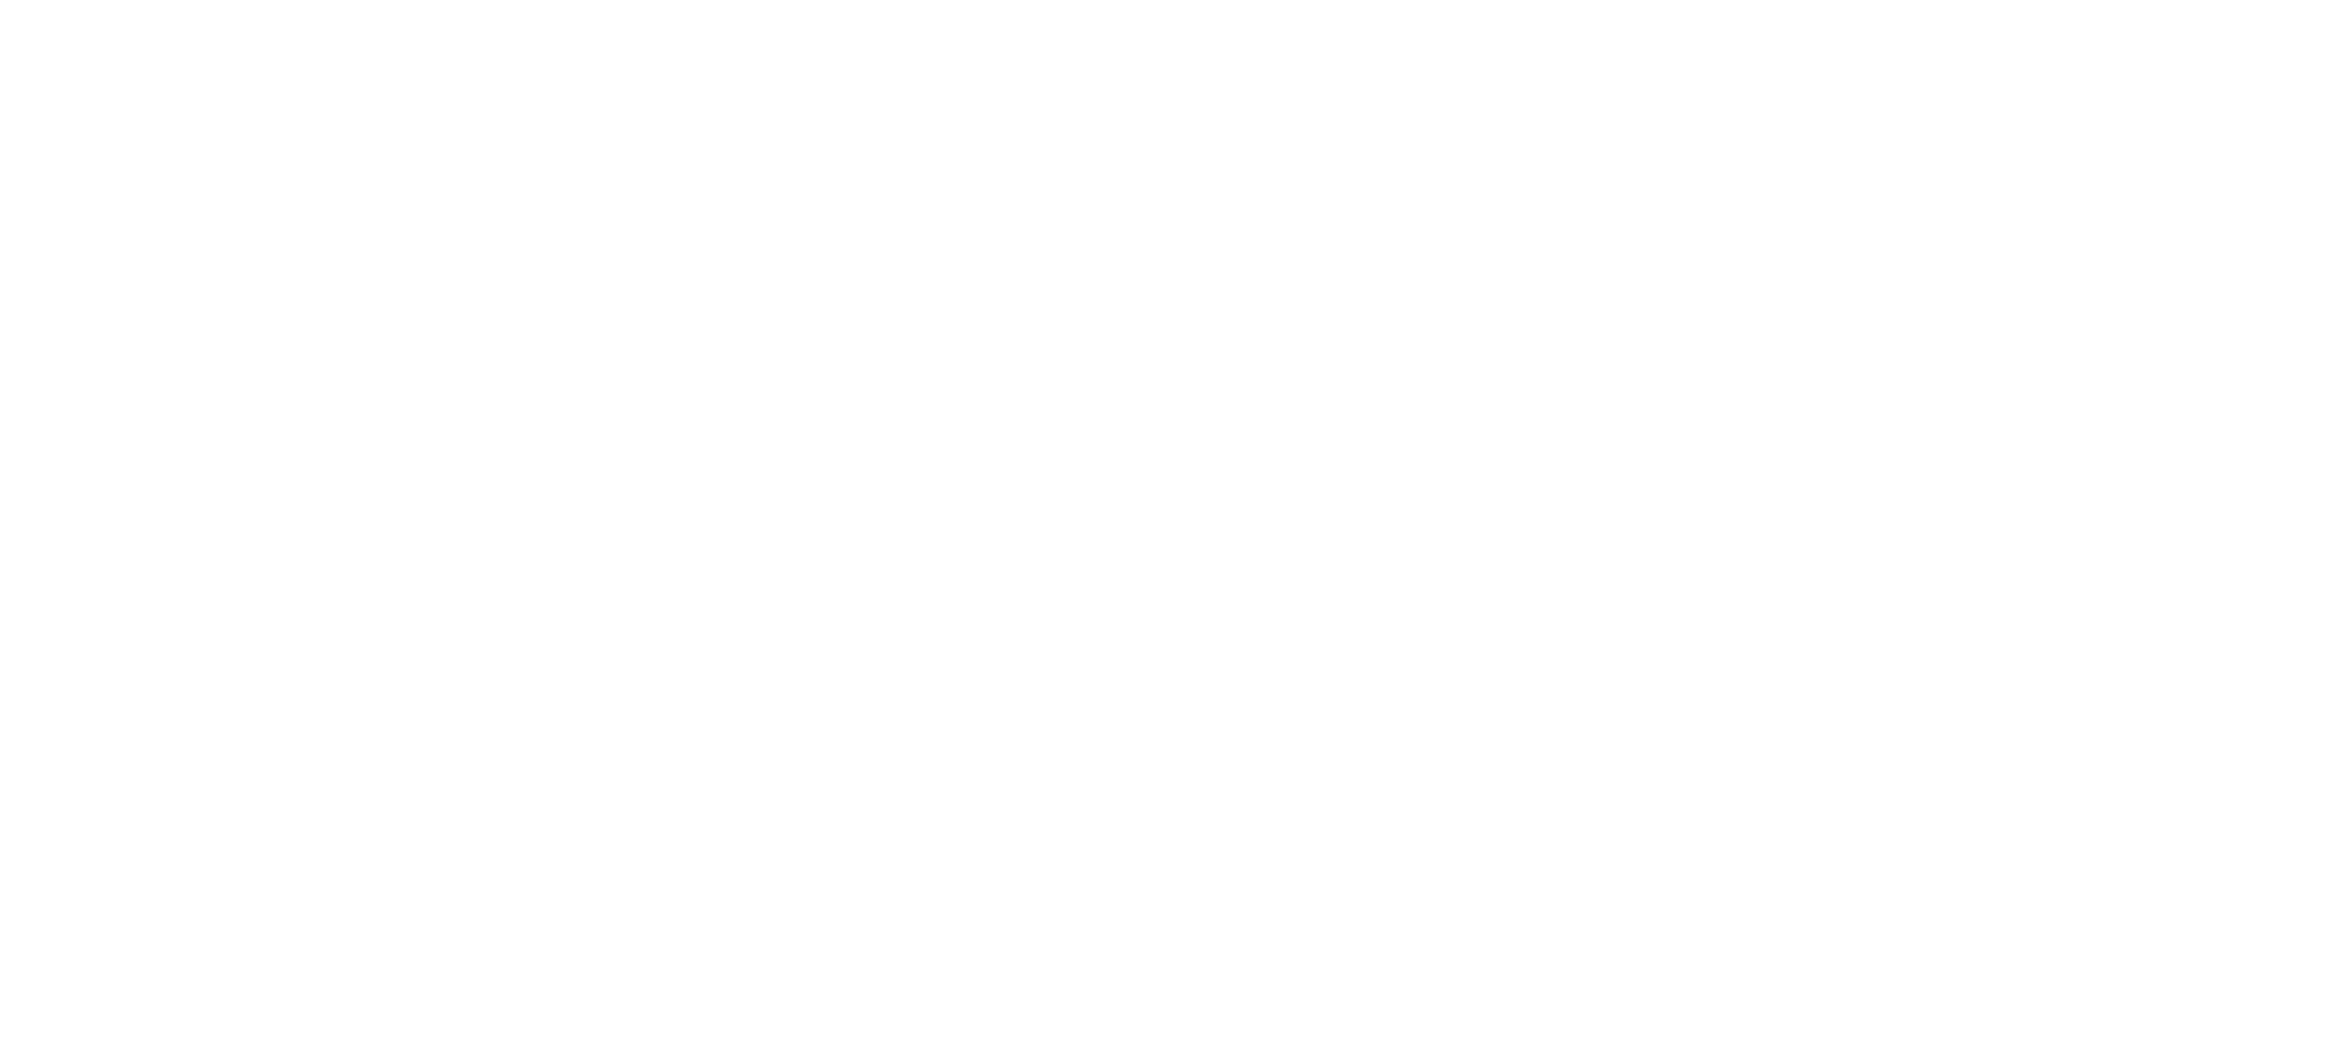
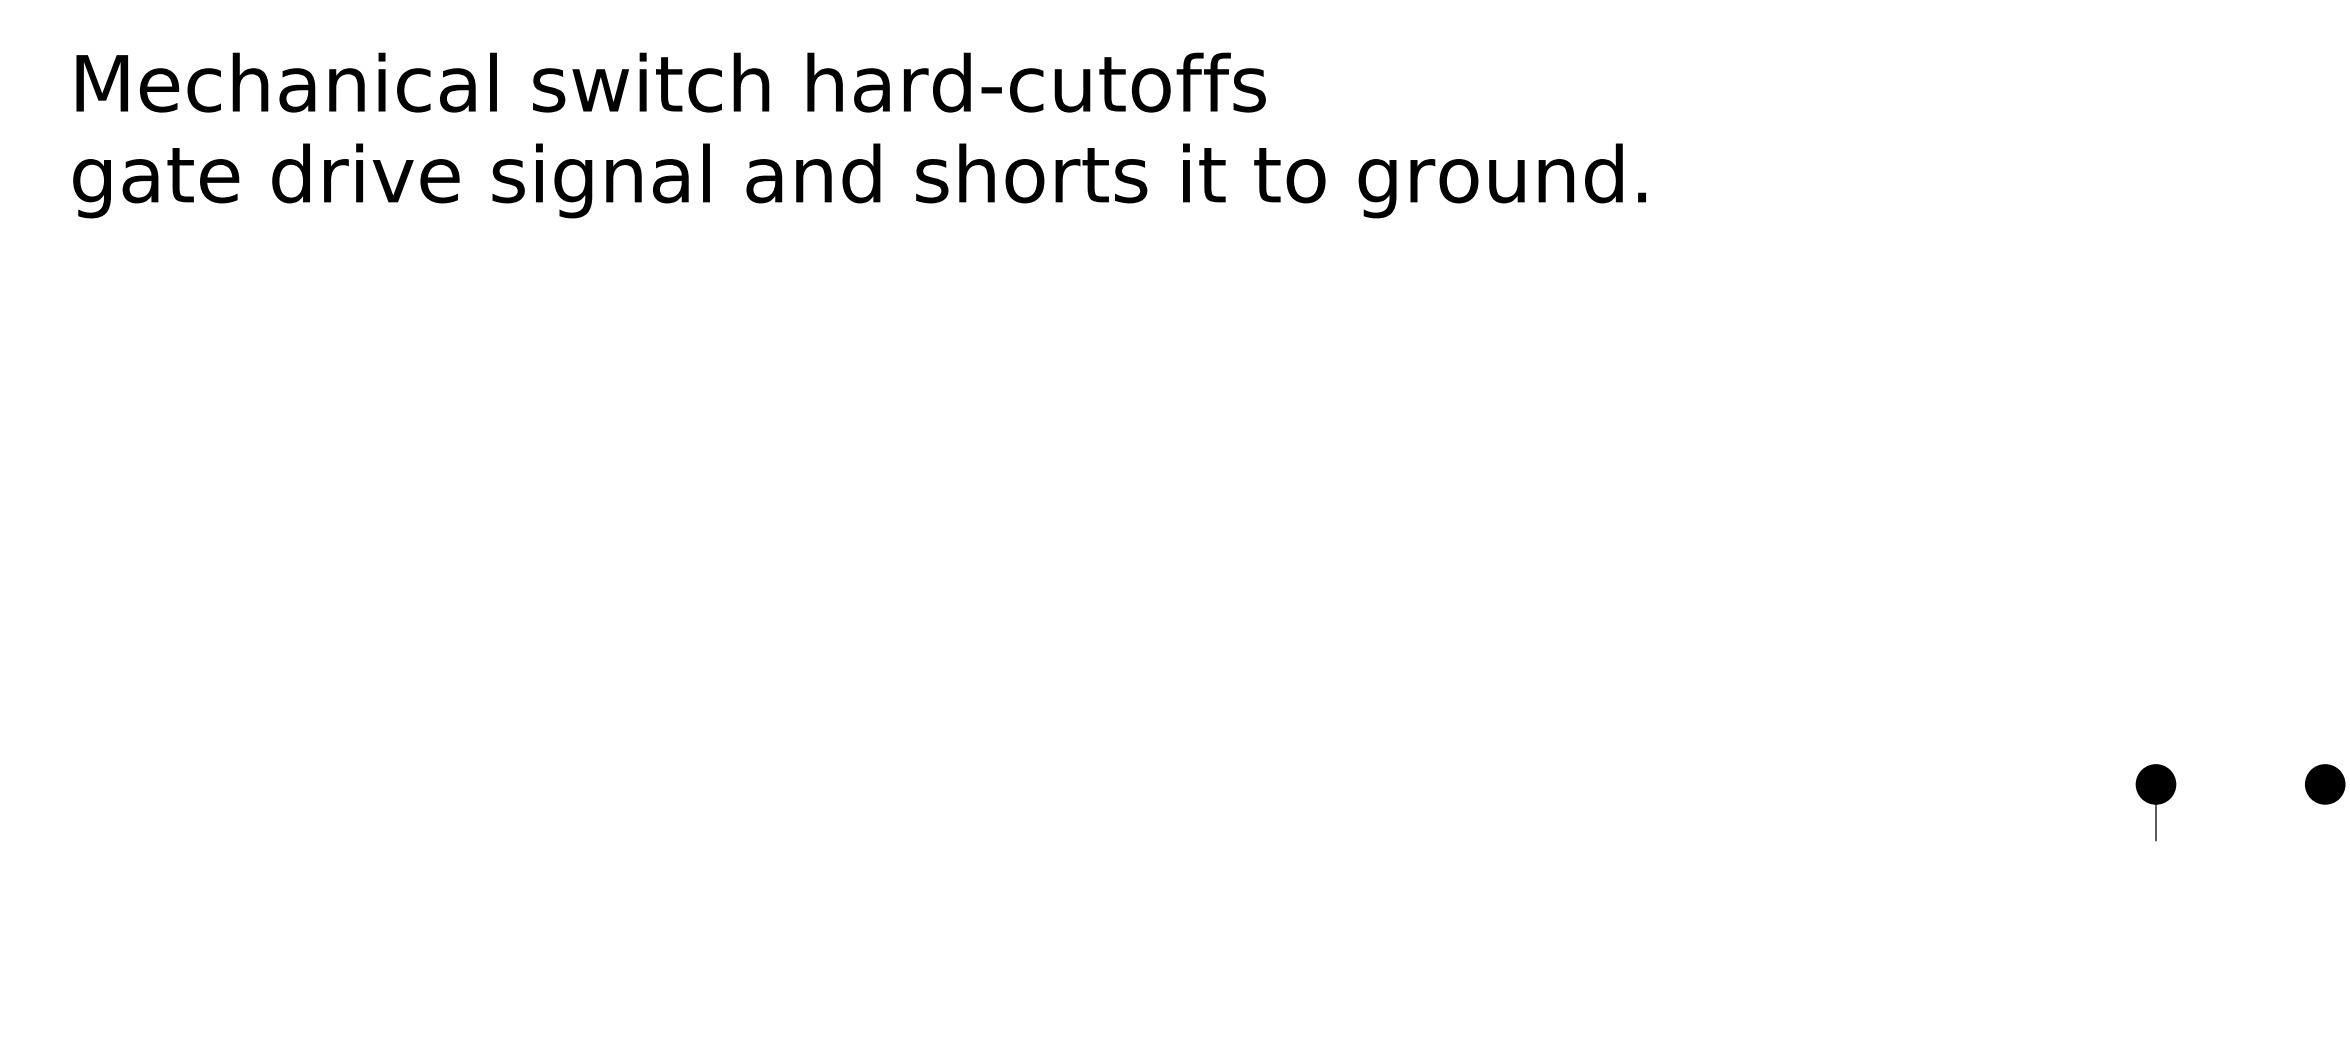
text: none -> Mechanical switch hard-cutoffs (671, 82)
text: none -> gate drive signal and shorts it to ground. (859, 180)
wire: none -> (2155, 784) (2155, 840)
junction: none -> (2155, 784)
junction: none -> (2325, 784)

